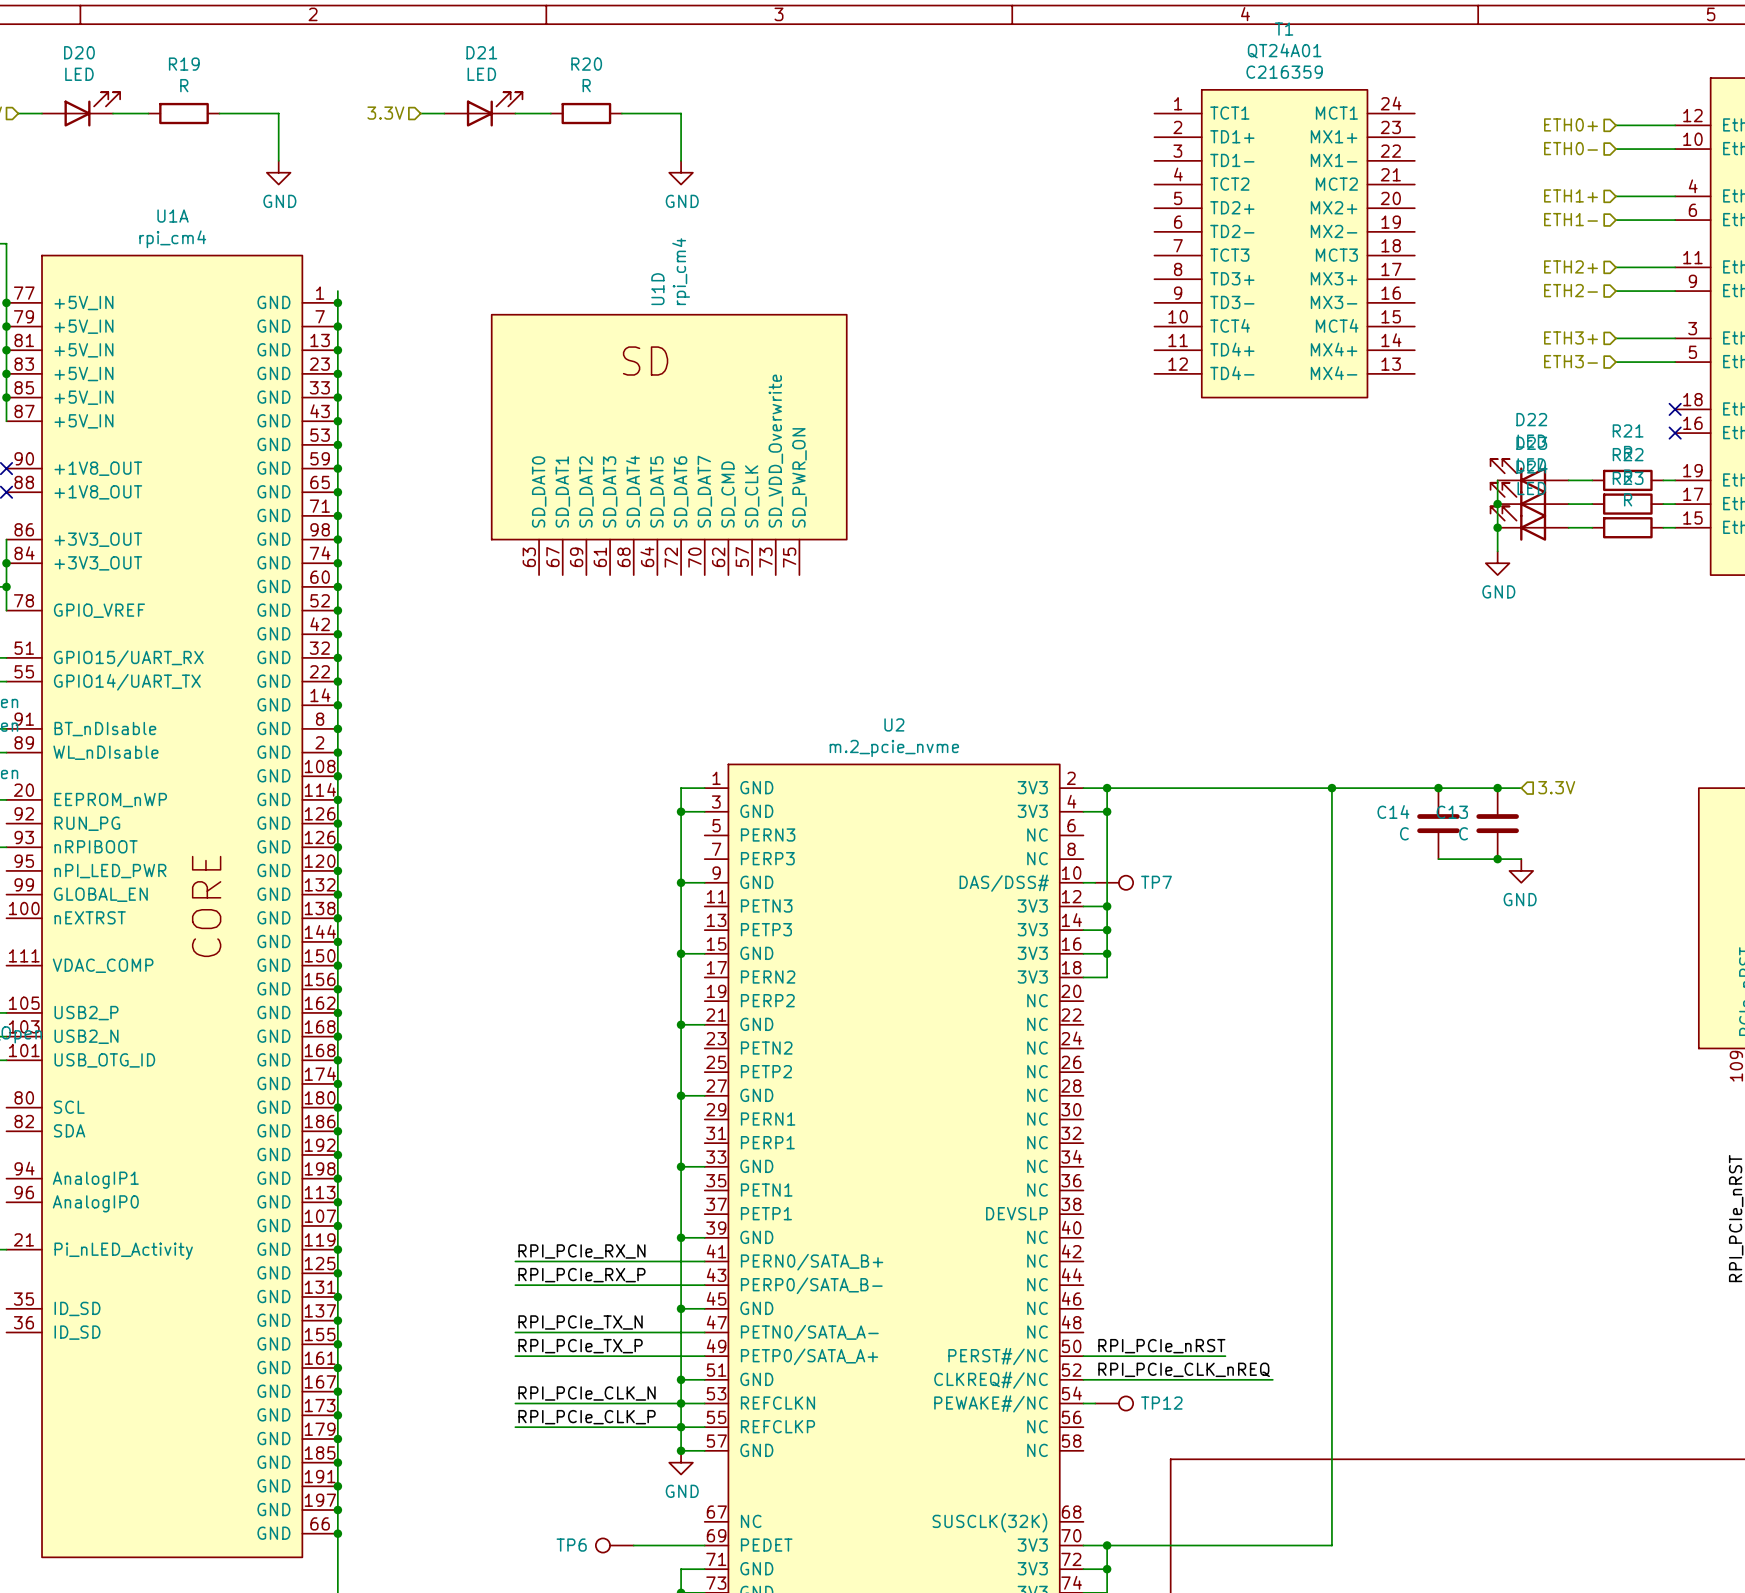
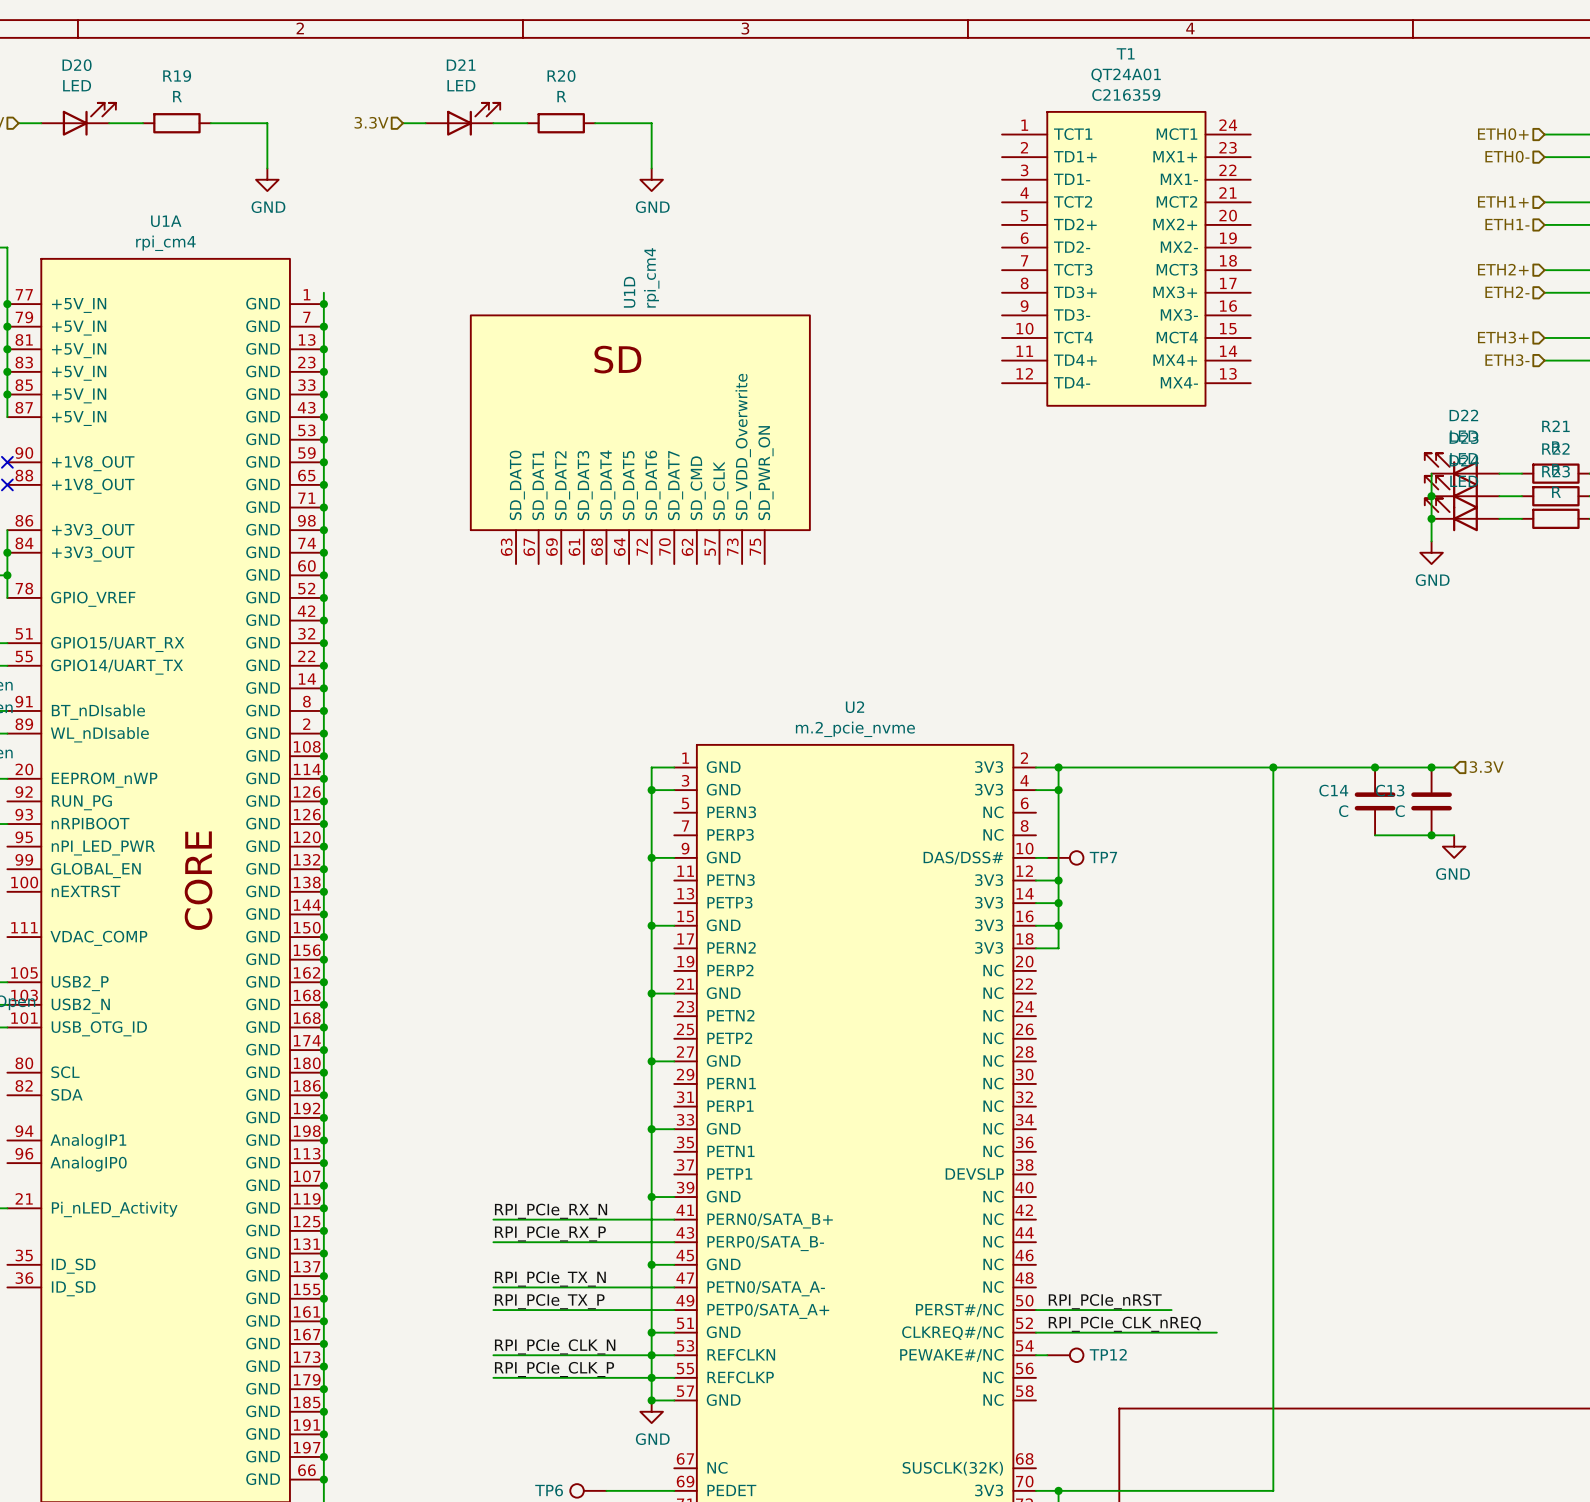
T1 position: (1284, 243) -> (1126, 258)

